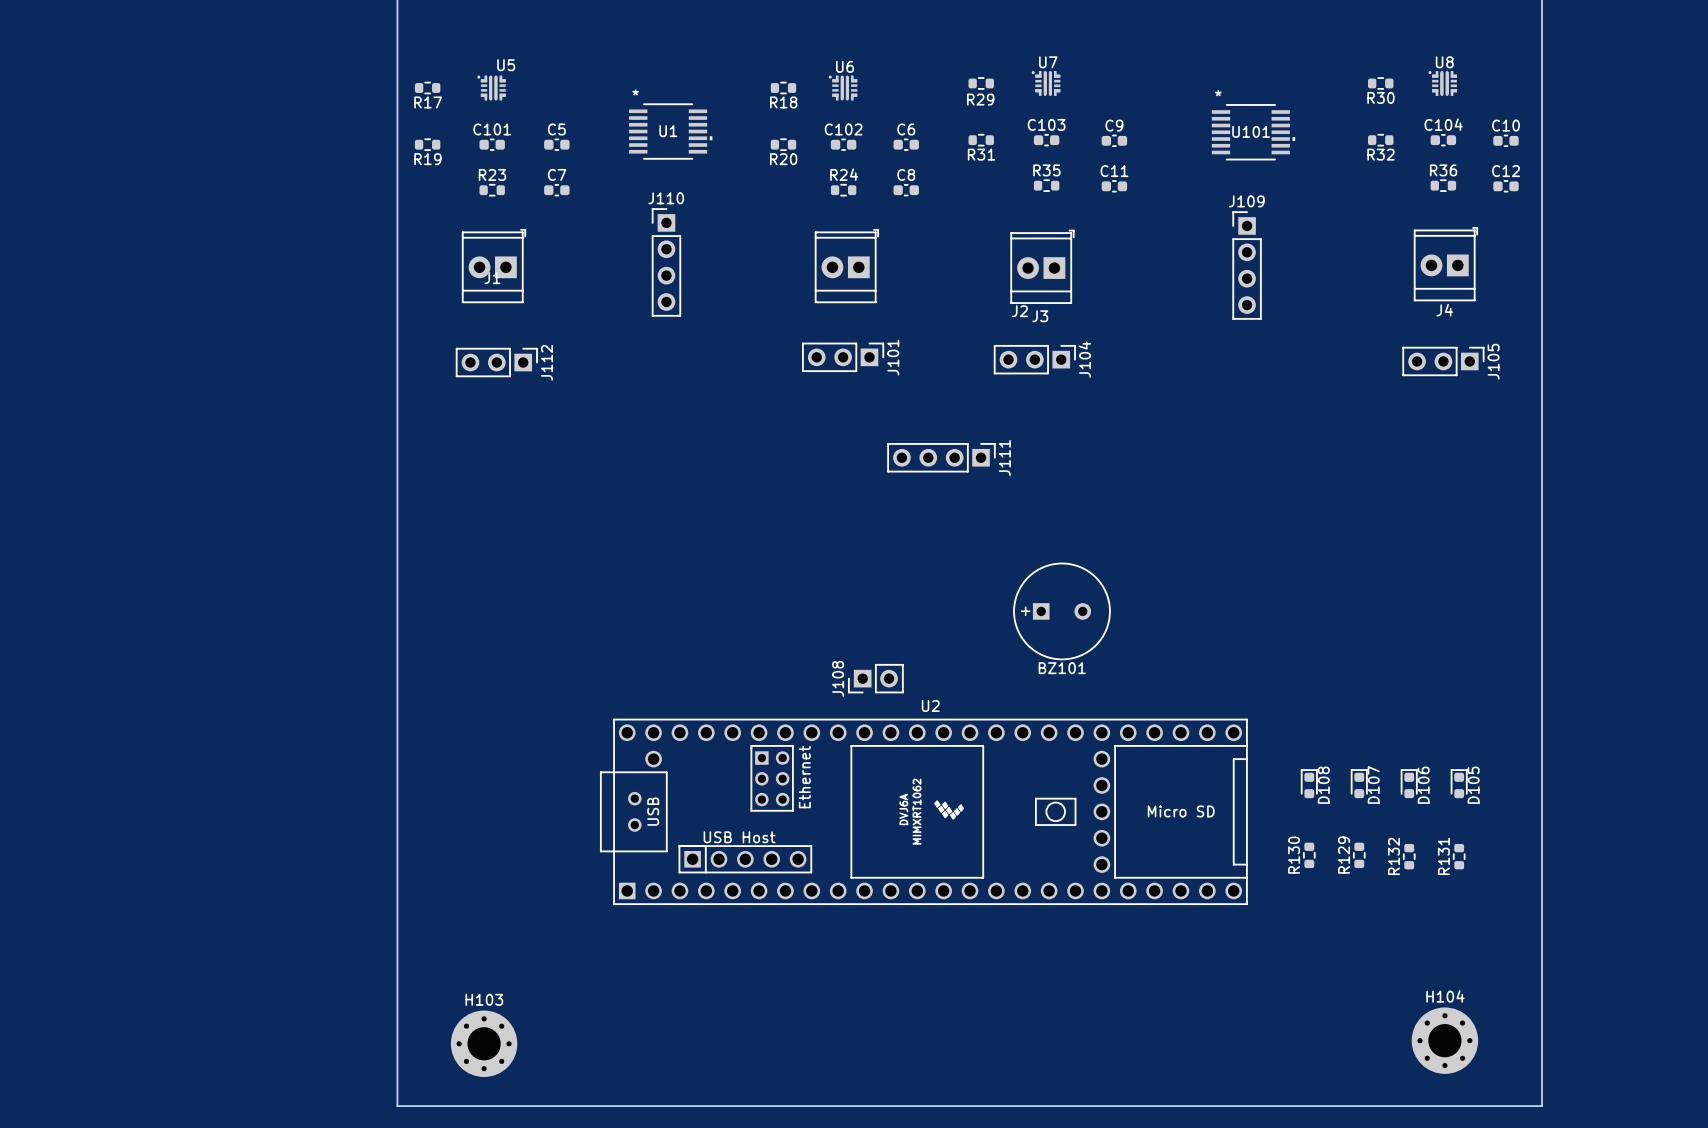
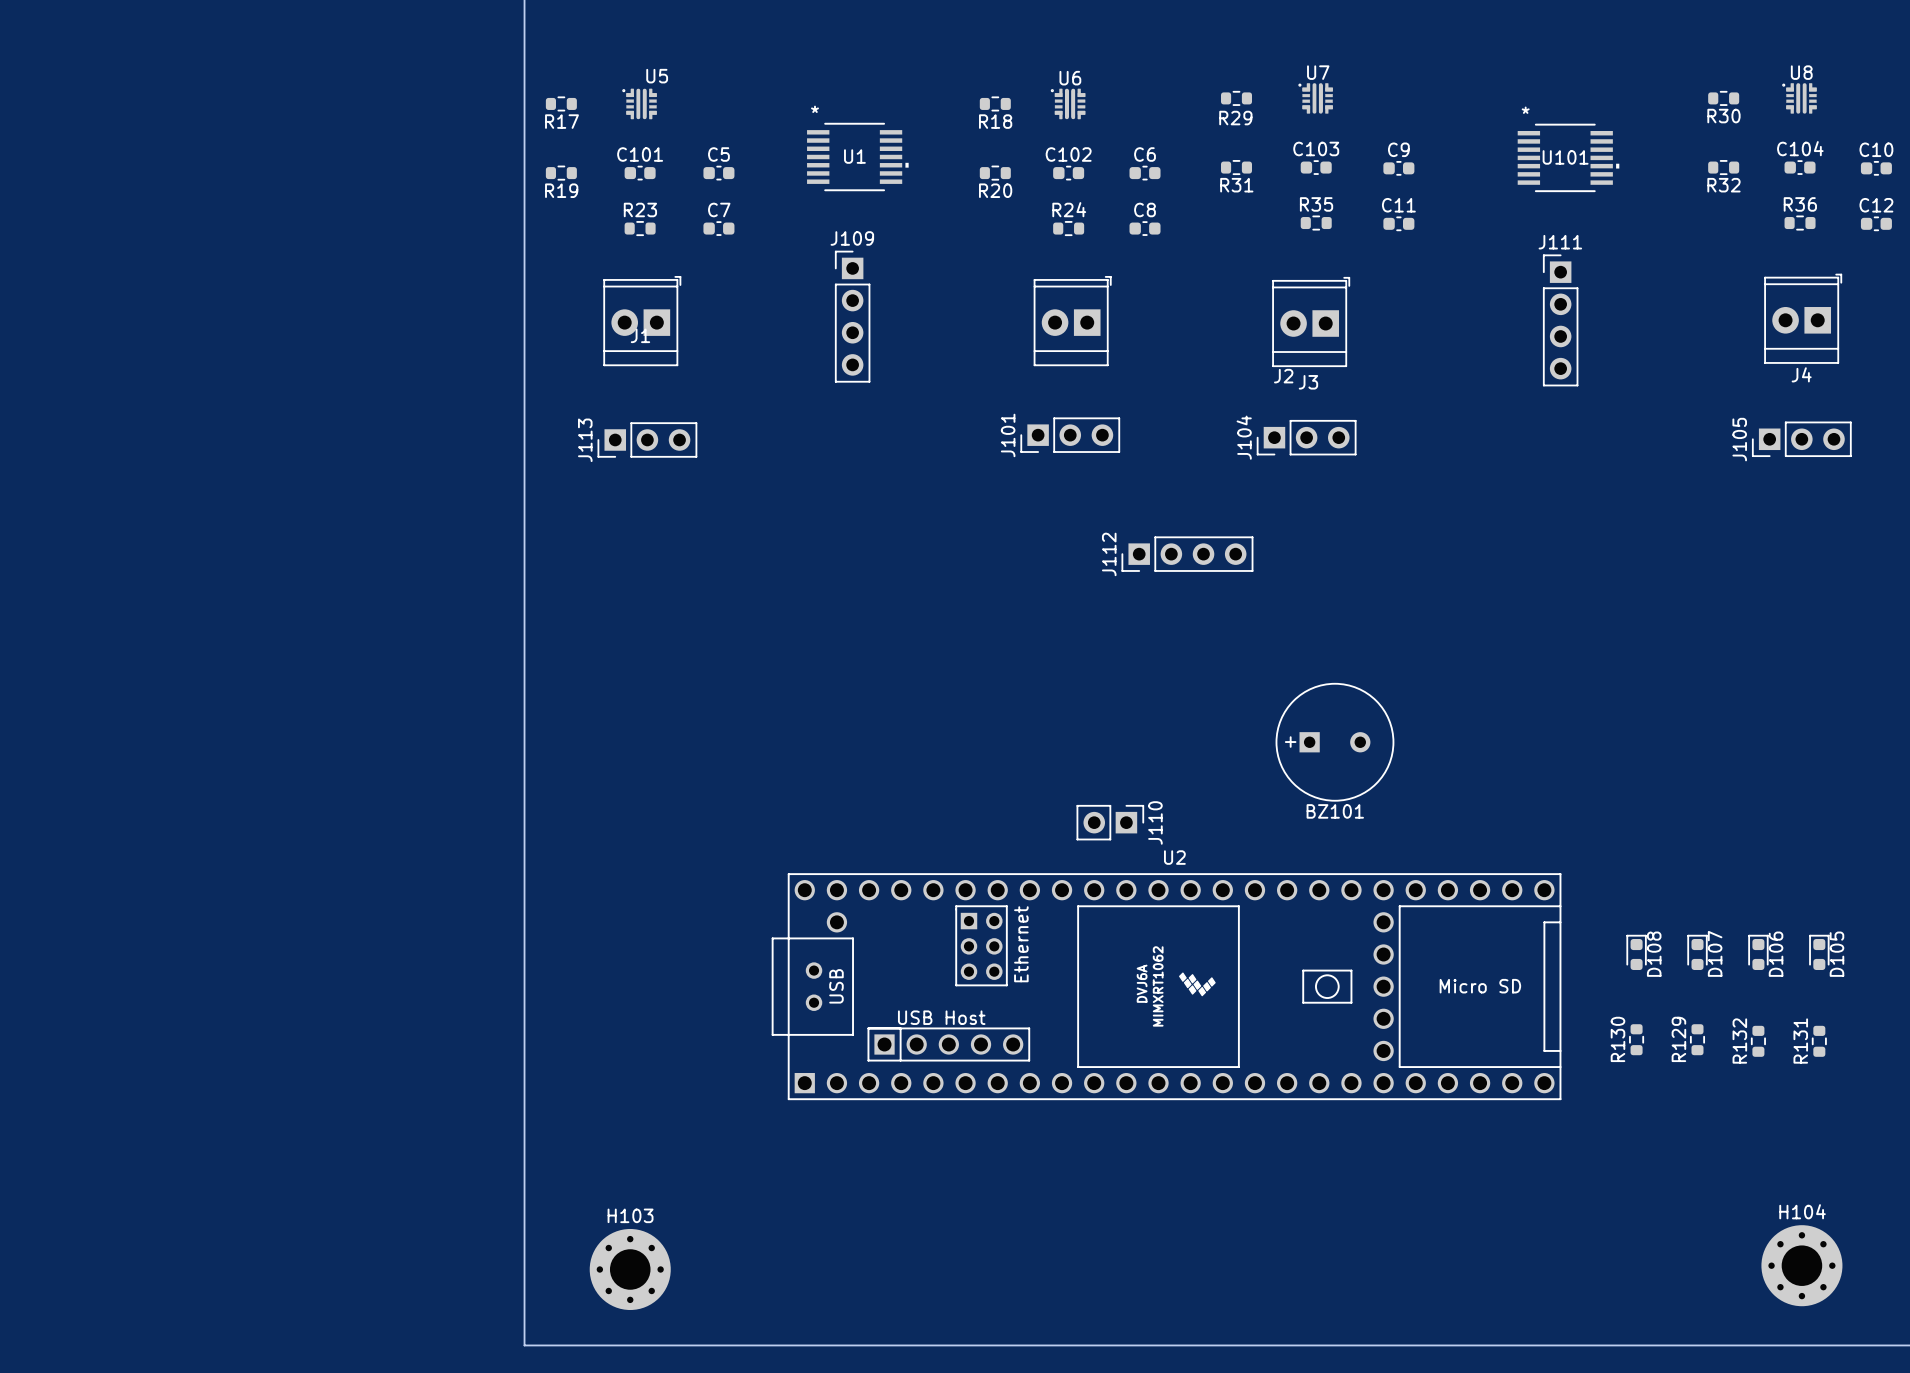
J110 name: J110 (666, 198) -> J109 (852, 238)
J109 name: J109 (1246, 201) -> J111 (1560, 242)
J112 footprint: [456, 348, 538, 377] -> [1121, 536, 1254, 572]
J101 rotation: 0° (843, 357) -> 180° (1070, 435)
J104 rotation: 0° (1034, 359) -> 180° (1306, 437)
J105 rotation: 0° (1443, 361) -> 180° (1801, 439)
J112 name position: J112 (547, 362) -> J112 (1109, 554)
J113: none -> (647, 439)
J111: (941, 457) -> none
J110: none -> (1110, 822)
J108: (875, 678) -> none

